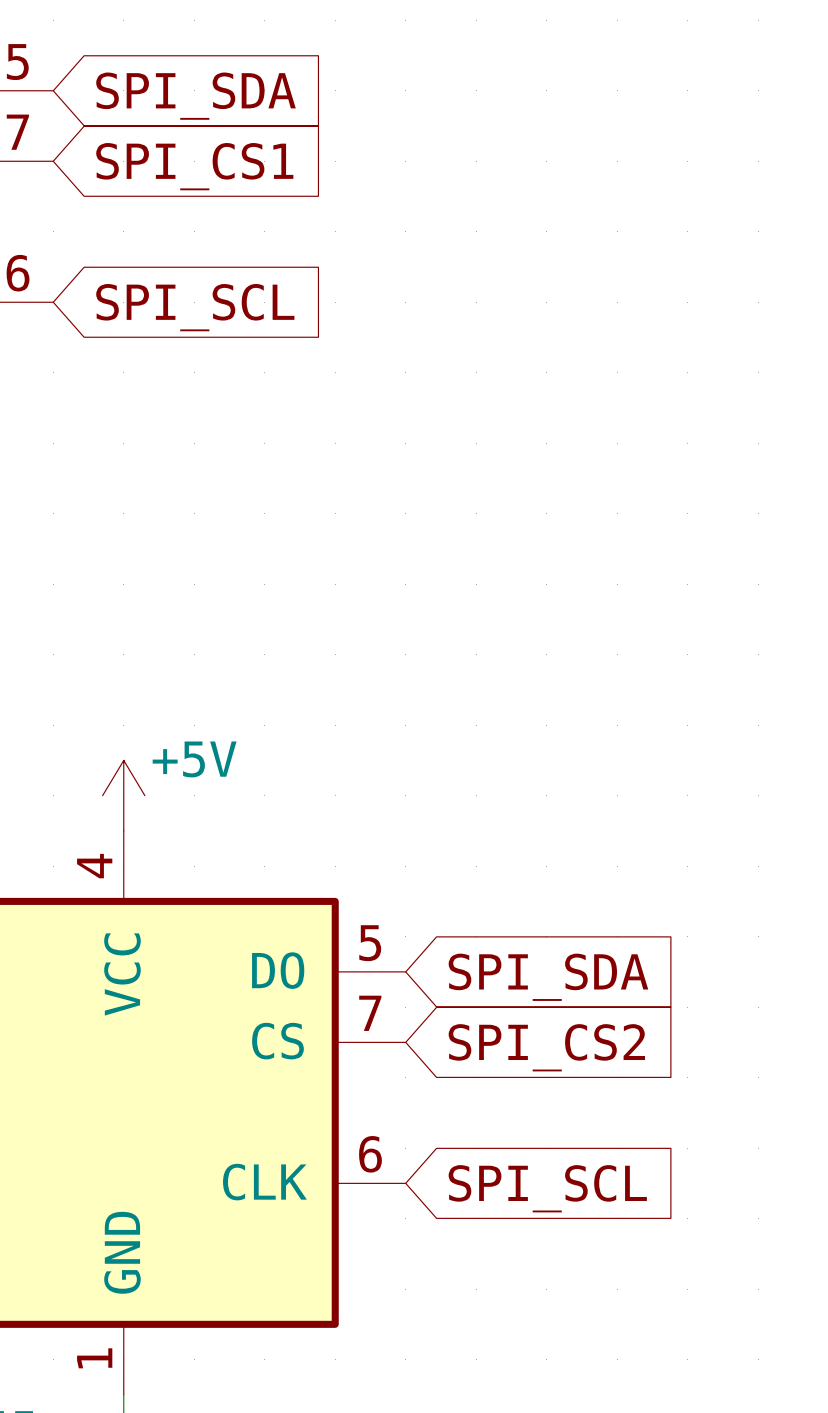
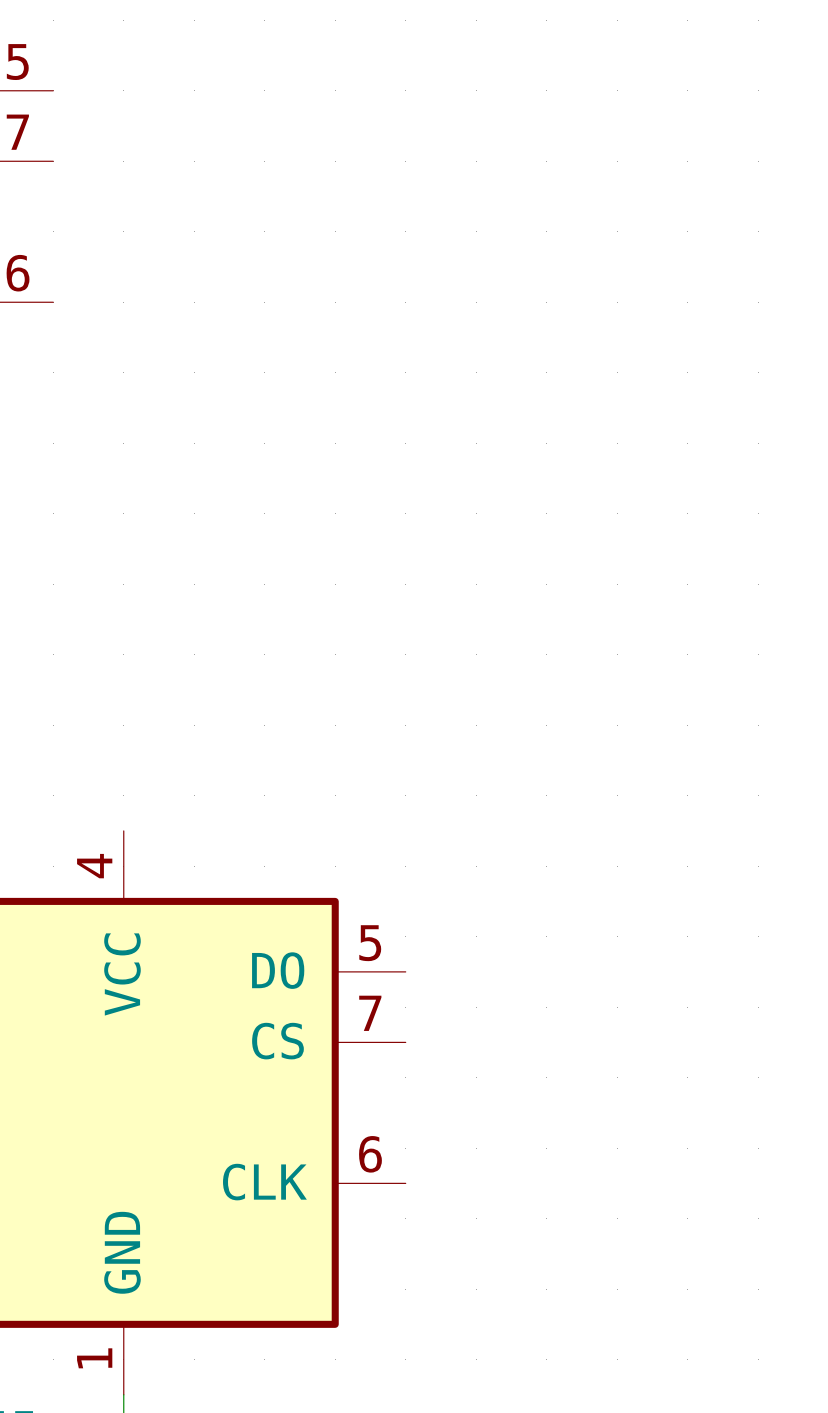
global label: SPI_SDA (196, 96) -> none
global label: SPI_CS1 (194, 166) -> none
global label: SPI_SCL (195, 307) -> none
power symbol: +5V (123, 795) -> none
global label: SPI_SDA (548, 977) -> none
global label: SPI_CS2 (546, 1047) -> none
global label: SPI_SCL (547, 1188) -> none

